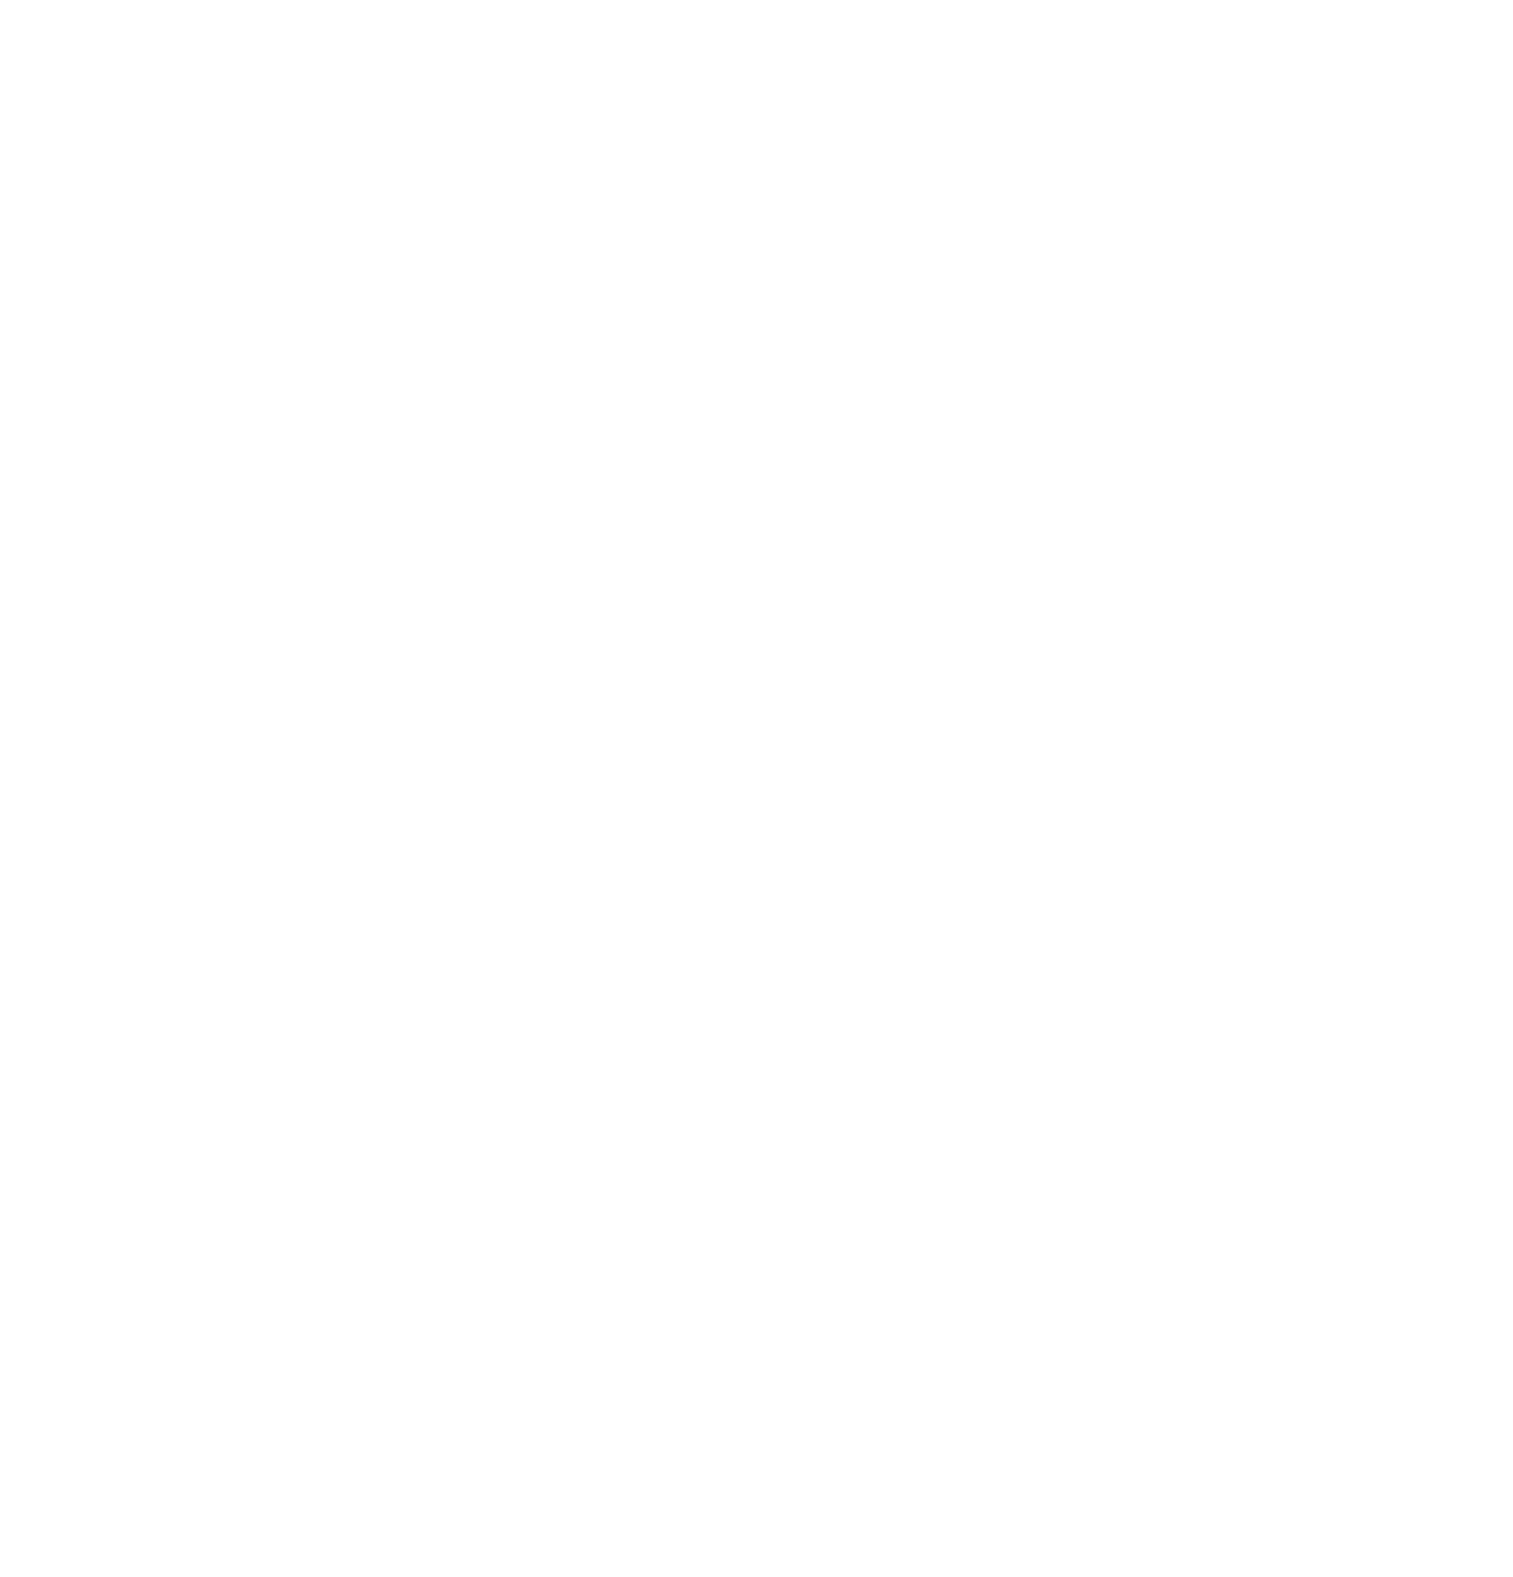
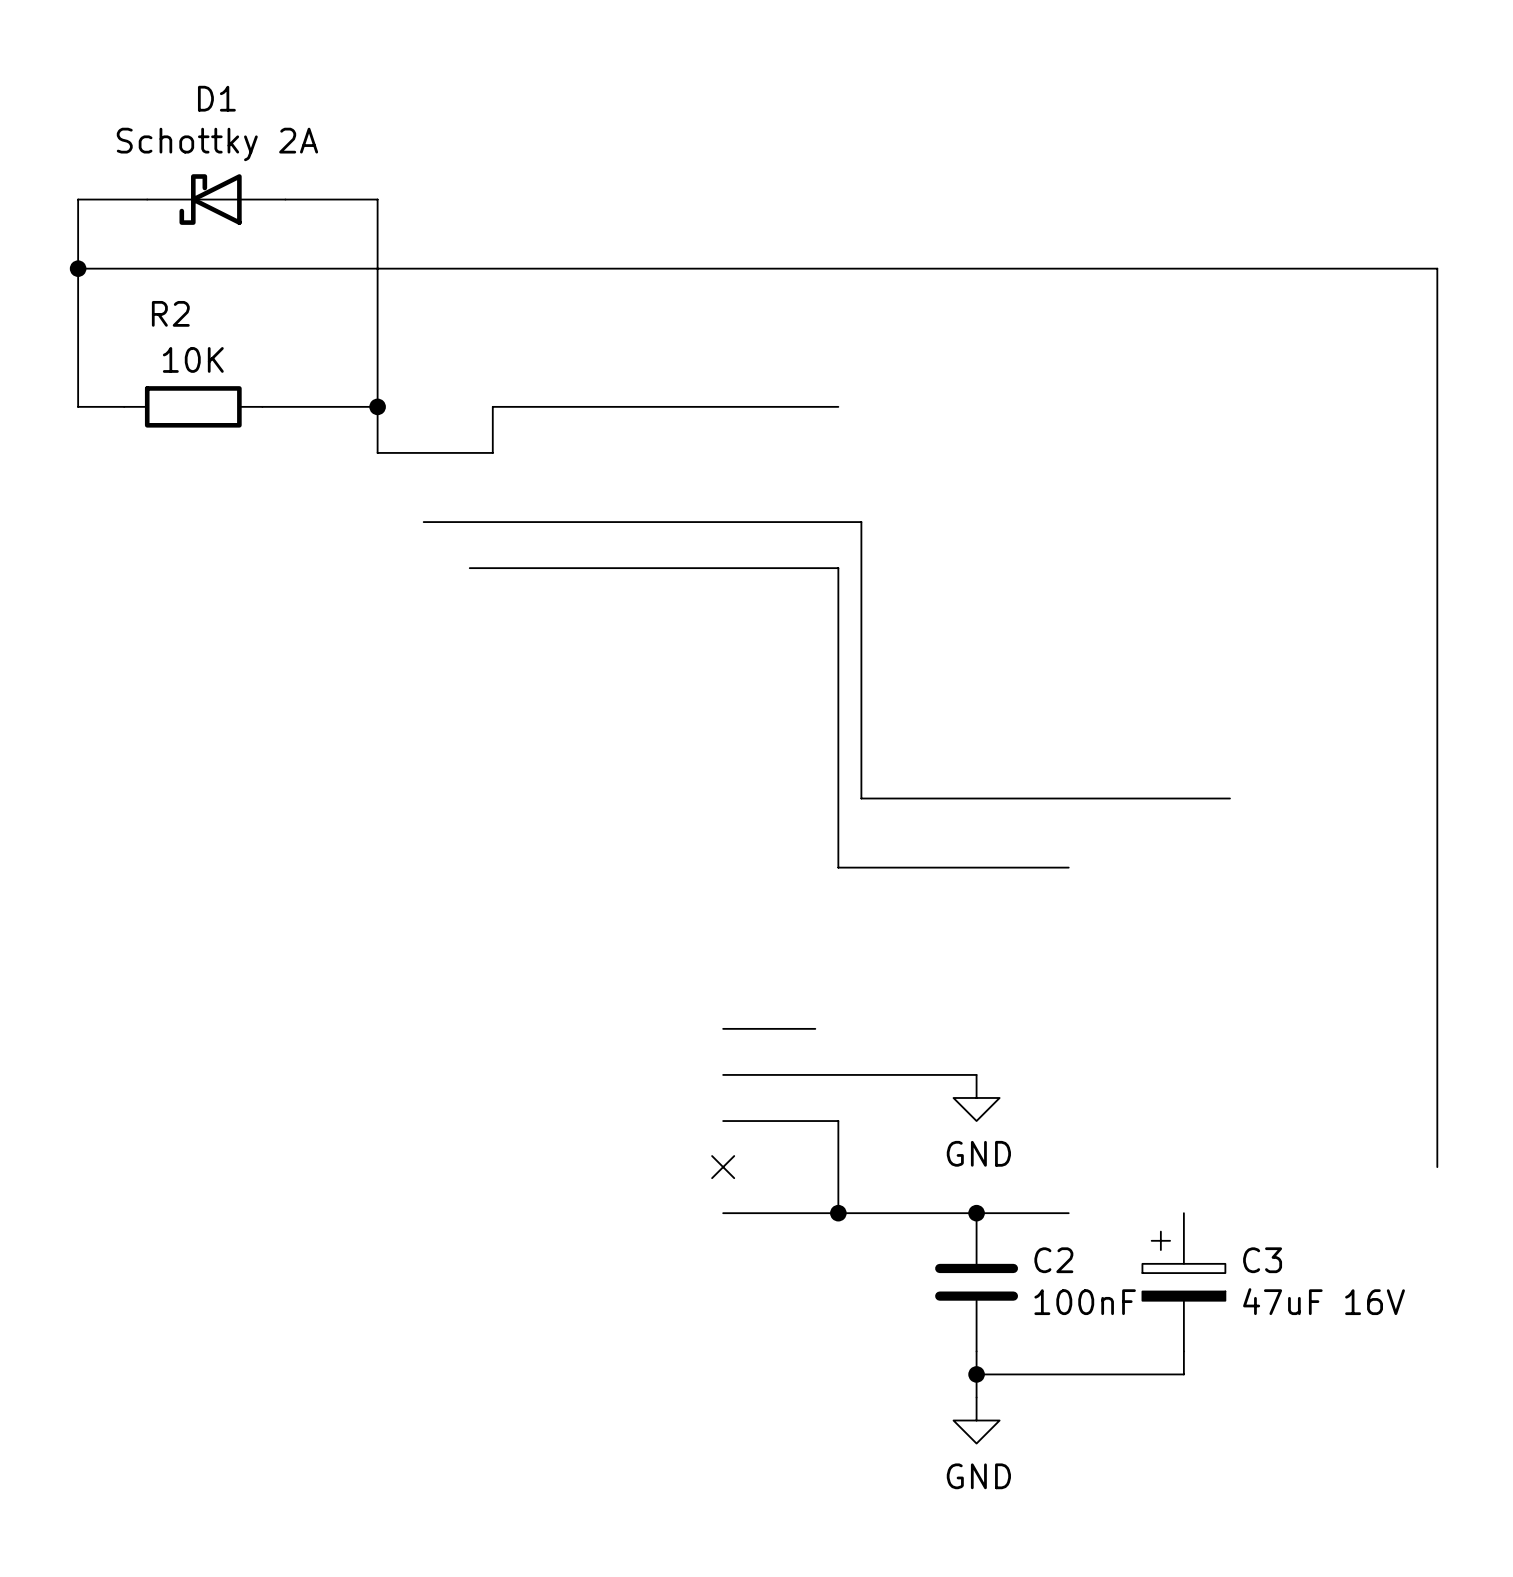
wire: none -> (147, 199) (78, 199) (78, 406) (124, 406)
D1: none -> Schottky 2A (216, 199)
wire: none -> (285, 199) (377, 199) (377, 452) (492, 452) (492, 406) (838, 406)
wire: none -> (78, 268) (1437, 268) (1437, 1167)
junction: none -> (78, 268)
R2: none -> 10K (193, 406)
wire: none -> (262, 406) (377, 406)
junction: none -> (377, 406)
wire: none -> (423, 522) (861, 522) (861, 798) (1229, 798)
wire: none -> (469, 568) (838, 568) (838, 867) (1068, 867)
wire: none -> (723, 1028) (815, 1028)
wire: none -> (723, 1074) (976, 1074)
power symbol: none -> GND (976, 1097)
wire: none -> (723, 1121) (838, 1121) (838, 1213)
no-connect mark: none -> (723, 1167)
wire: none -> (723, 1213) (1068, 1213)
junction: none -> (838, 1213)
junction: none -> (976, 1213)
C2: none -> 100nF (976, 1282)
C3: none -> 47uF 16V (1183, 1282)
wire: none -> (976, 1351) (976, 1397)
wire: none -> (1183, 1351) (1183, 1374) (976, 1374)
junction: none -> (976, 1374)
power symbol: none -> GND (976, 1420)

